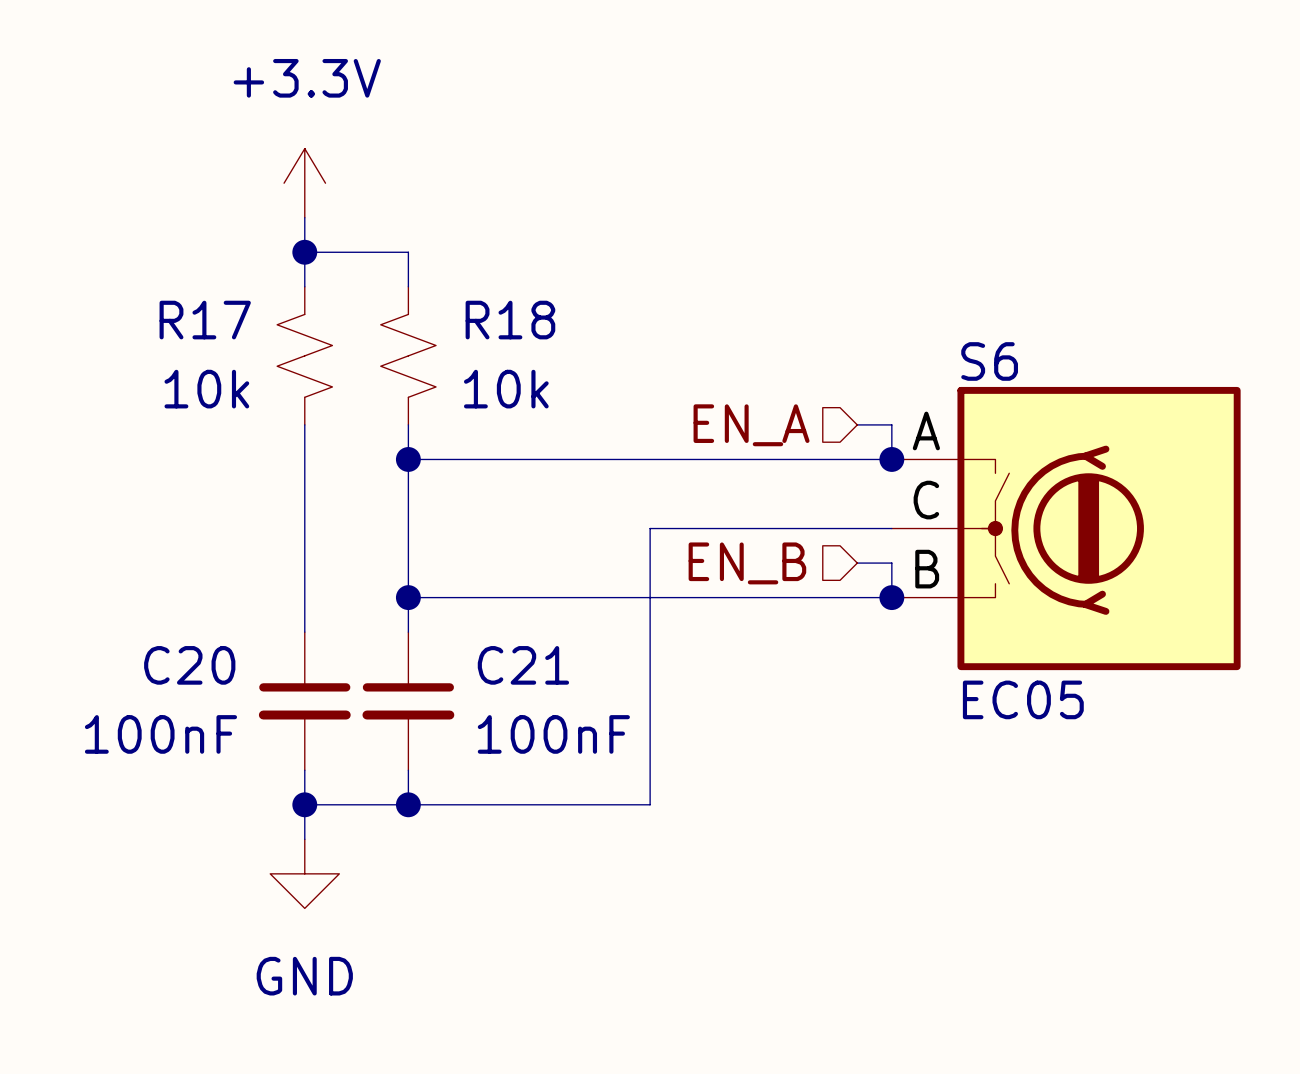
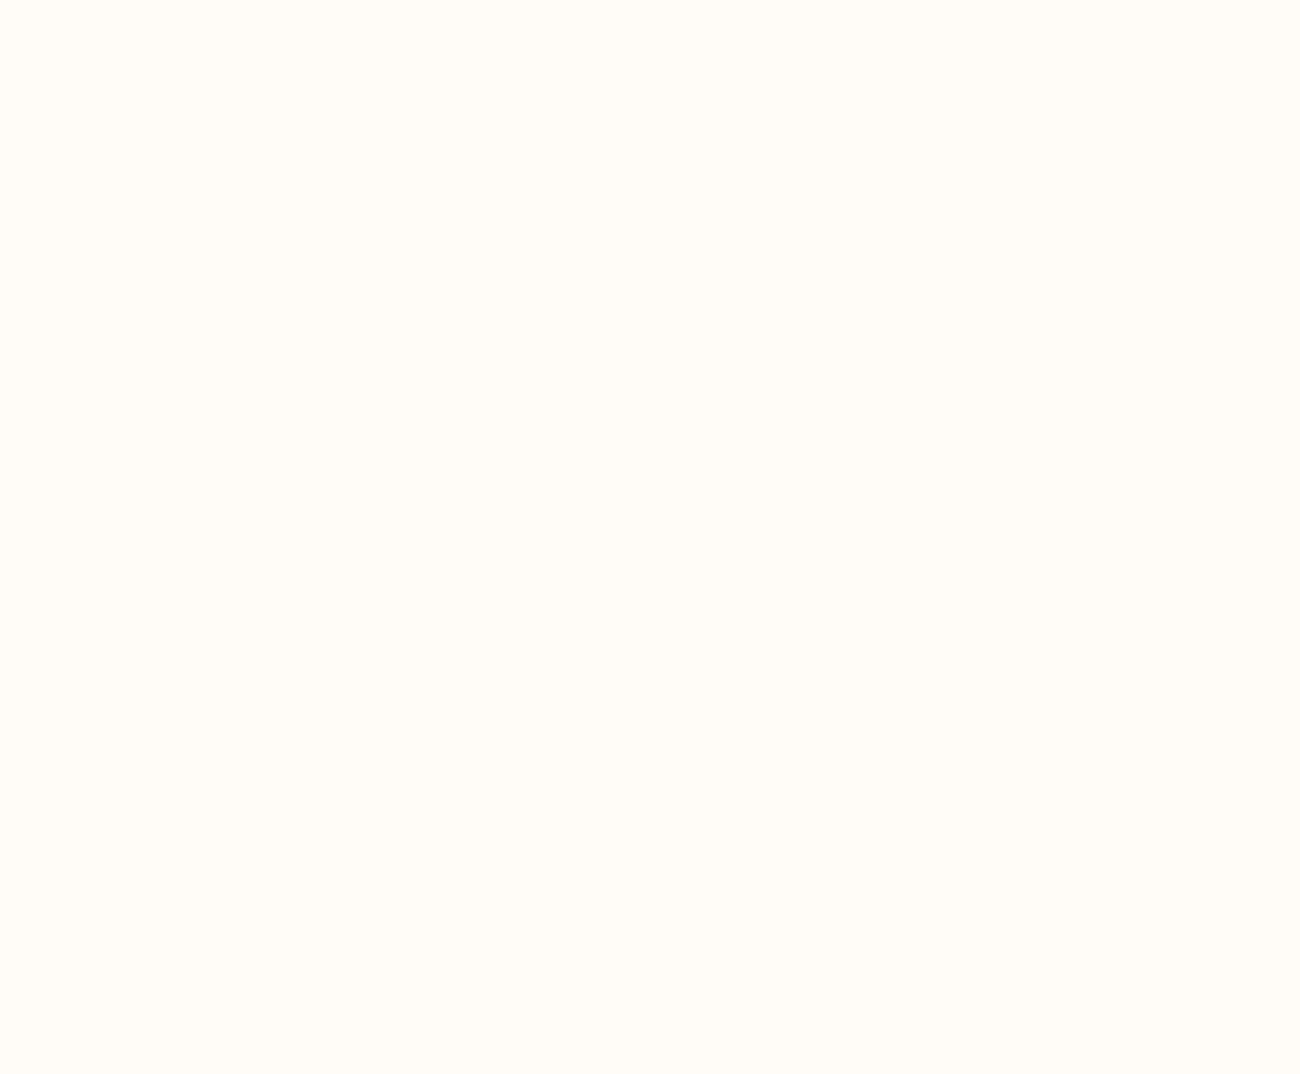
power symbol: +3.3V (304, 183) -> none
wire: (304, 217) (304, 286) -> none
wire: (304, 252) (408, 252) (408, 286) -> none
junction: (304, 252) -> none
R17: 10k (304, 355) -> none
R18: 10k (408, 355) -> none
wire: (304, 424) (304, 632) -> none
wire: (408, 424) (408, 632) -> none
wire: (857, 424) (891, 424) (891, 459) (408, 459) -> none
hierarchical label: EN_A (751, 425) -> none
junction: (408, 459) -> none
junction: (891, 459) -> none
wire: (891, 528) (650, 528) (650, 804) (304, 804) -> none
S6: EC05 (1066, 528) -> none
hierarchical label: EN_B (747, 563) -> none
wire: (857, 563) (891, 563) (891, 597) (408, 597) -> none
junction: (408, 597) -> none
junction: (891, 597) -> none
C20: 100nF (304, 701) -> none
C21: 100nF (408, 701) -> none
wire: (304, 770) (304, 839) -> none
wire: (408, 770) (408, 804) -> none
junction: (304, 804) -> none
junction: (408, 804) -> none
power symbol: GND (304, 873) -> none

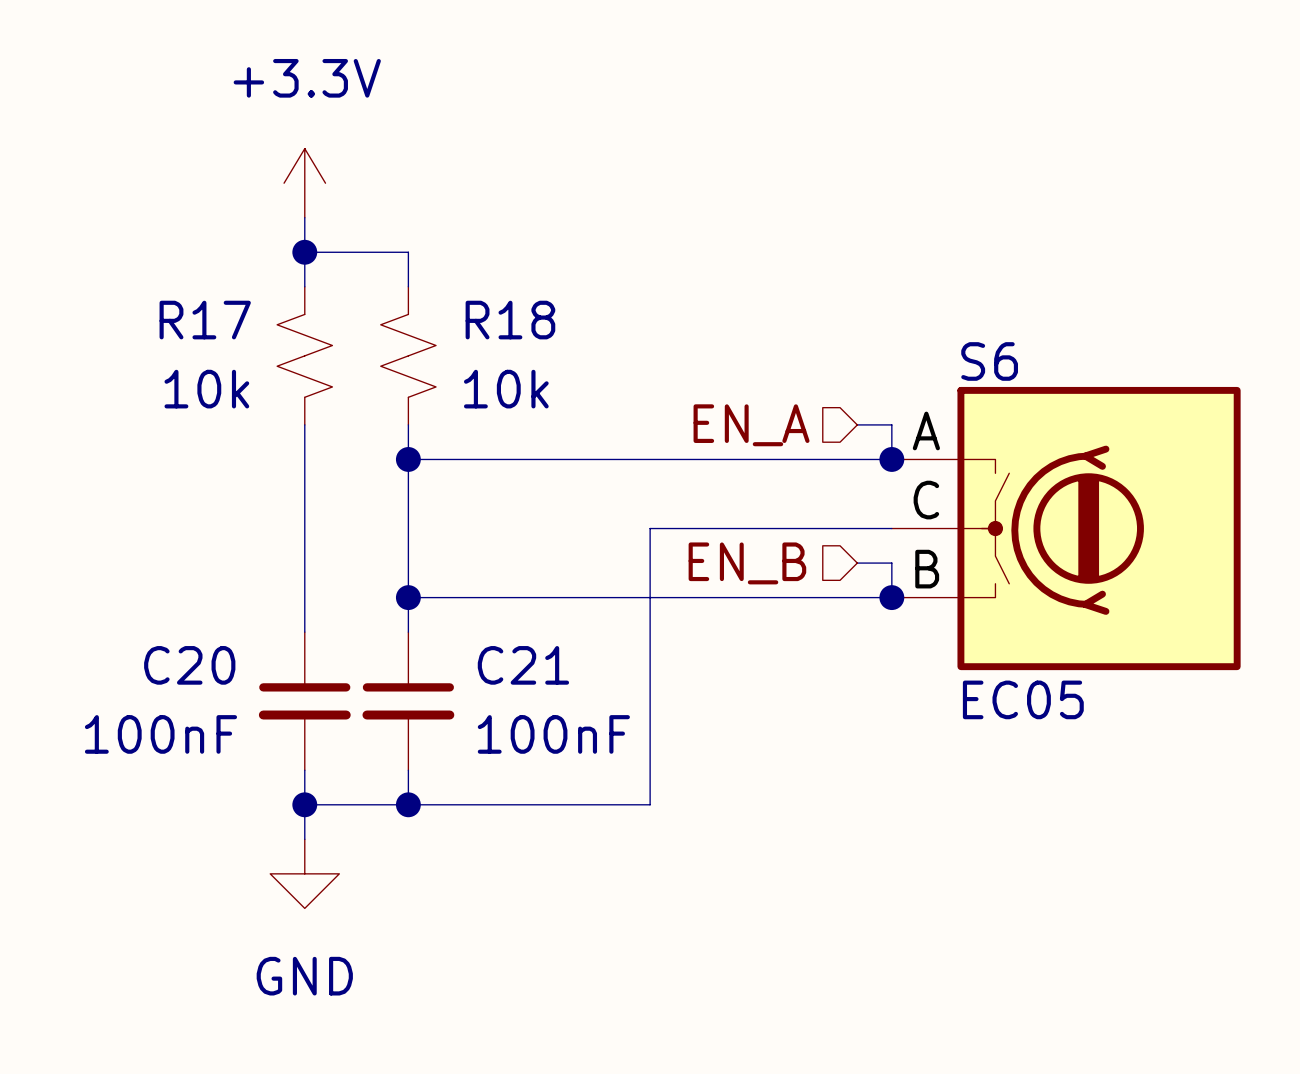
power symbol: none -> +3.3V (304, 183)
wire: none -> (304, 217) (304, 286)
wire: none -> (304, 252) (408, 252) (408, 286)
junction: none -> (304, 252)
R17: none -> 10k (304, 355)
R18: none -> 10k (408, 355)
wire: none -> (304, 424) (304, 632)
wire: none -> (408, 424) (408, 632)
wire: none -> (857, 424) (891, 424) (891, 459) (408, 459)
hierarchical label: none -> EN_A (751, 425)
junction: none -> (408, 459)
junction: none -> (891, 459)
wire: none -> (891, 528) (650, 528) (650, 804) (304, 804)
S6: none -> EC05 (1066, 528)
hierarchical label: none -> EN_B (747, 563)
wire: none -> (857, 563) (891, 563) (891, 597) (408, 597)
junction: none -> (408, 597)
junction: none -> (891, 597)
C20: none -> 100nF (304, 701)
C21: none -> 100nF (408, 701)
wire: none -> (304, 770) (304, 839)
wire: none -> (408, 770) (408, 804)
junction: none -> (304, 804)
junction: none -> (408, 804)
power symbol: none -> GND (304, 873)

